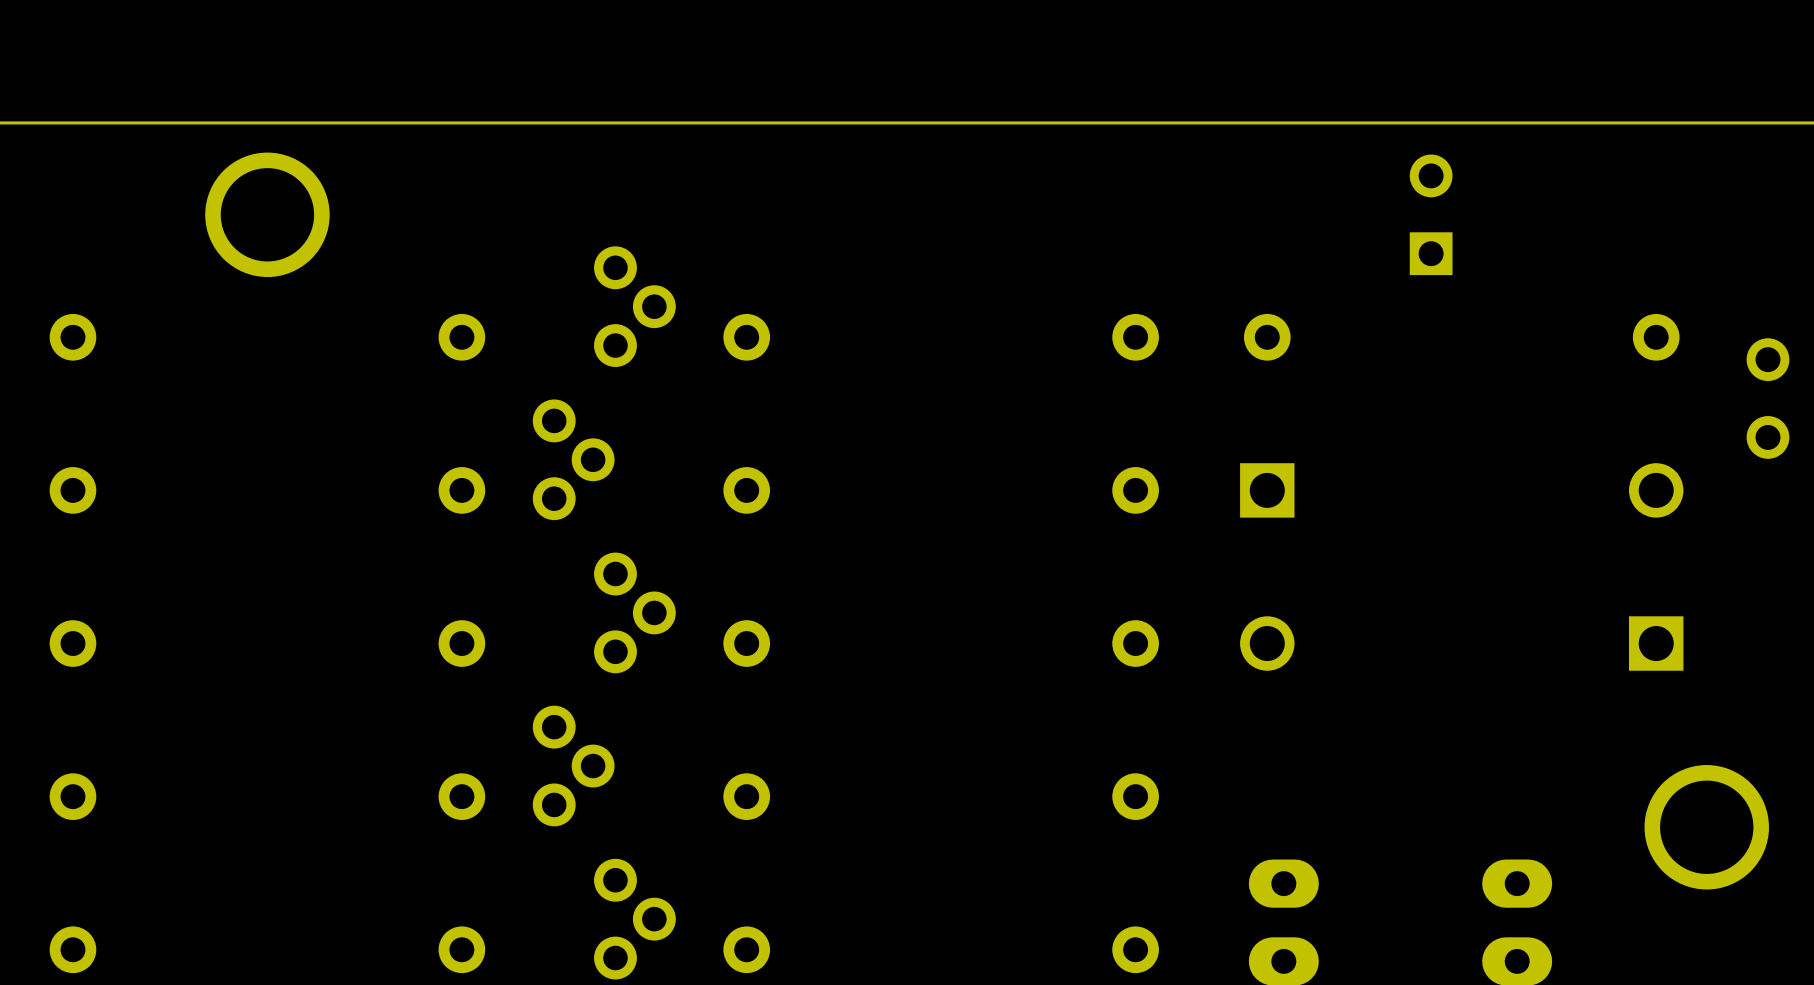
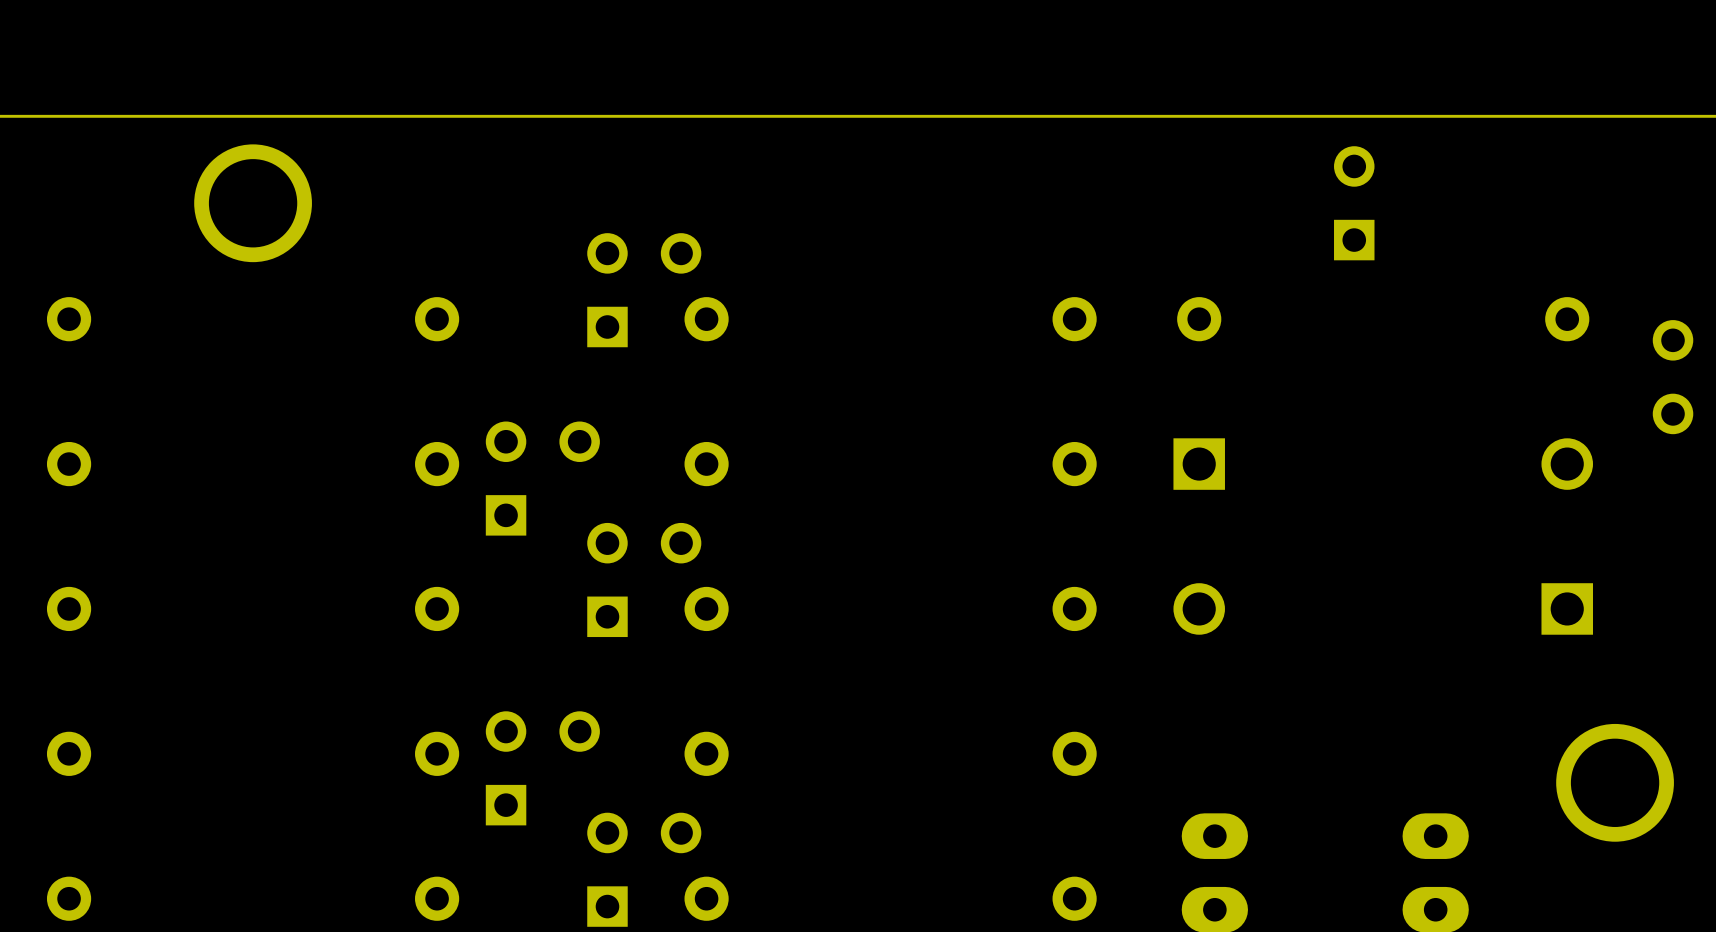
part: (634, 306) -> none
part: none -> (644, 290)
part: (573, 459) -> none
part: none -> (542, 478)
part: (634, 612) -> none
part: none -> (644, 579)
part: (573, 766) -> none
part: none -> (542, 768)
part: (634, 919) -> none
part: none -> (644, 869)

